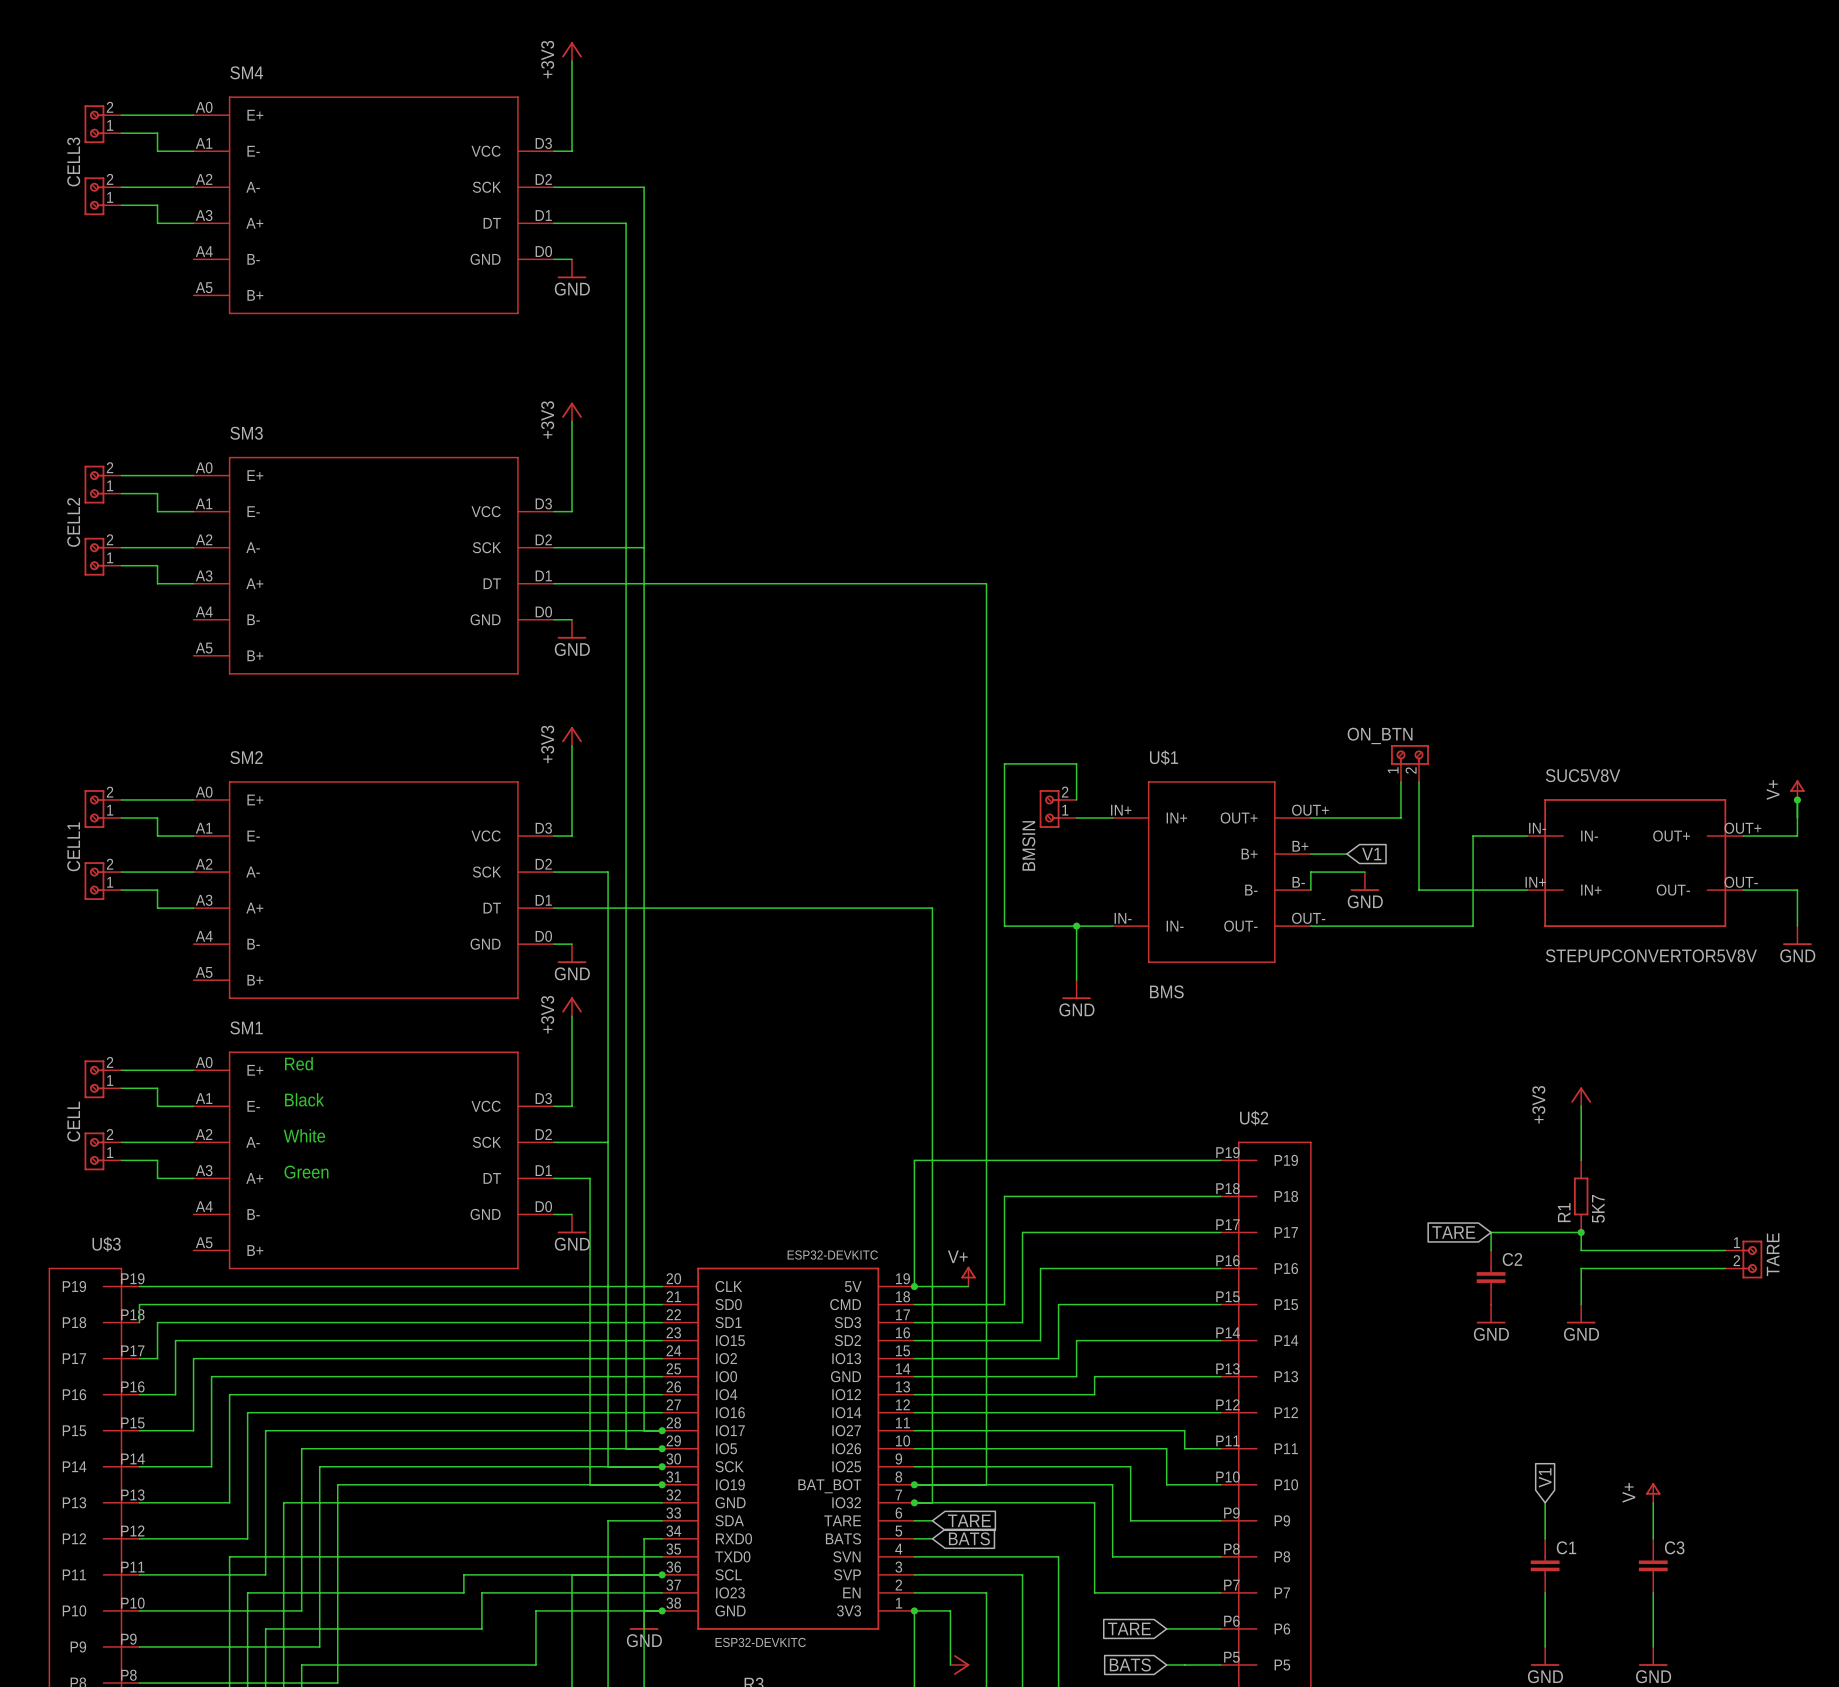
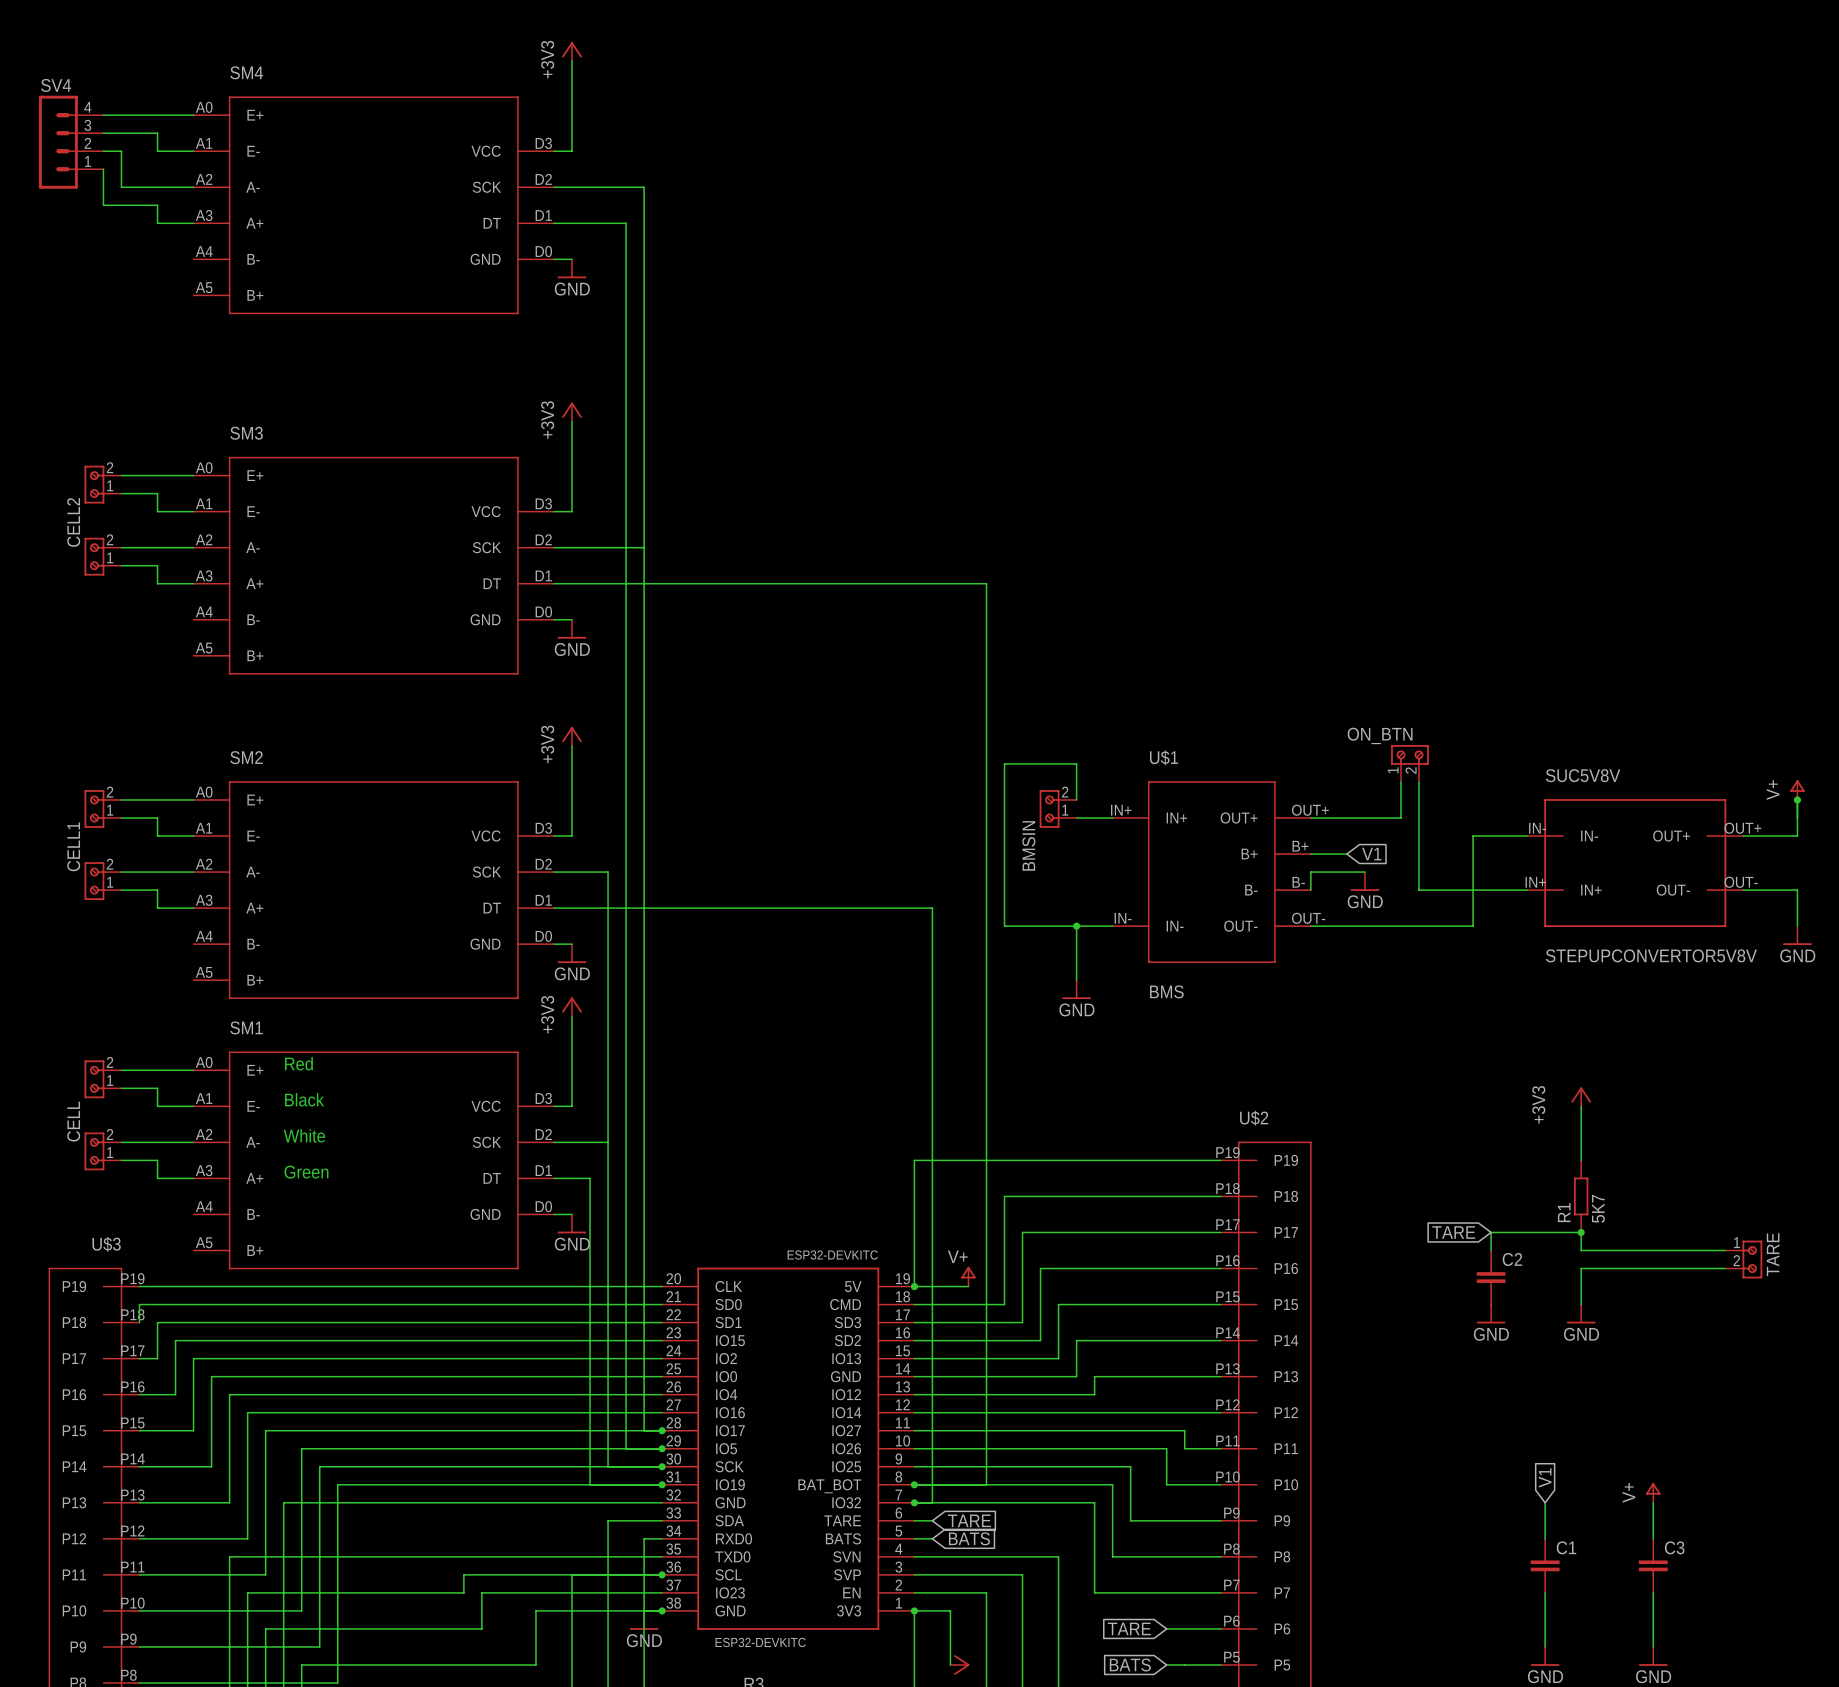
CELL3: (103, 124) -> none
SV4: none -> (71, 142)
wire: none -> (103, 151) (121, 151) (121, 187)
part: (103, 196) -> none

